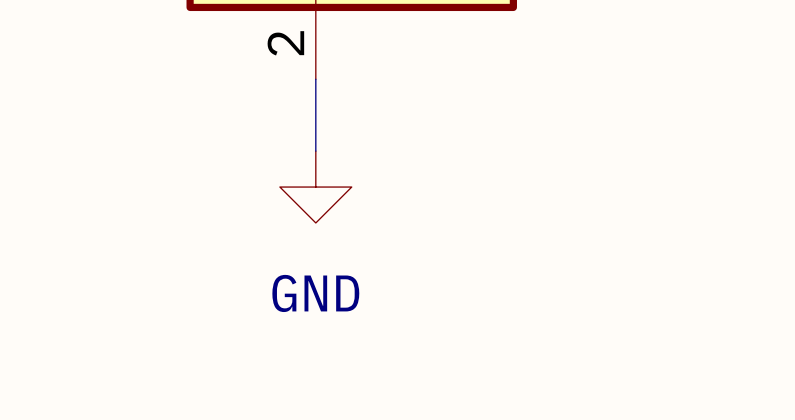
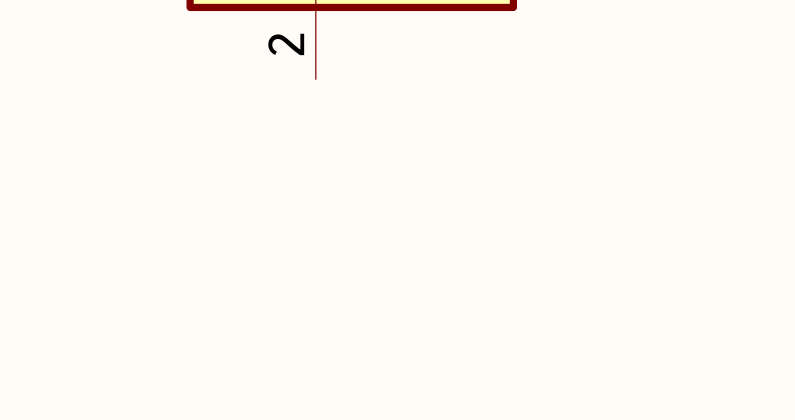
wire: (315, 79) (315, 151) -> none
power symbol: GND (315, 187) -> none

